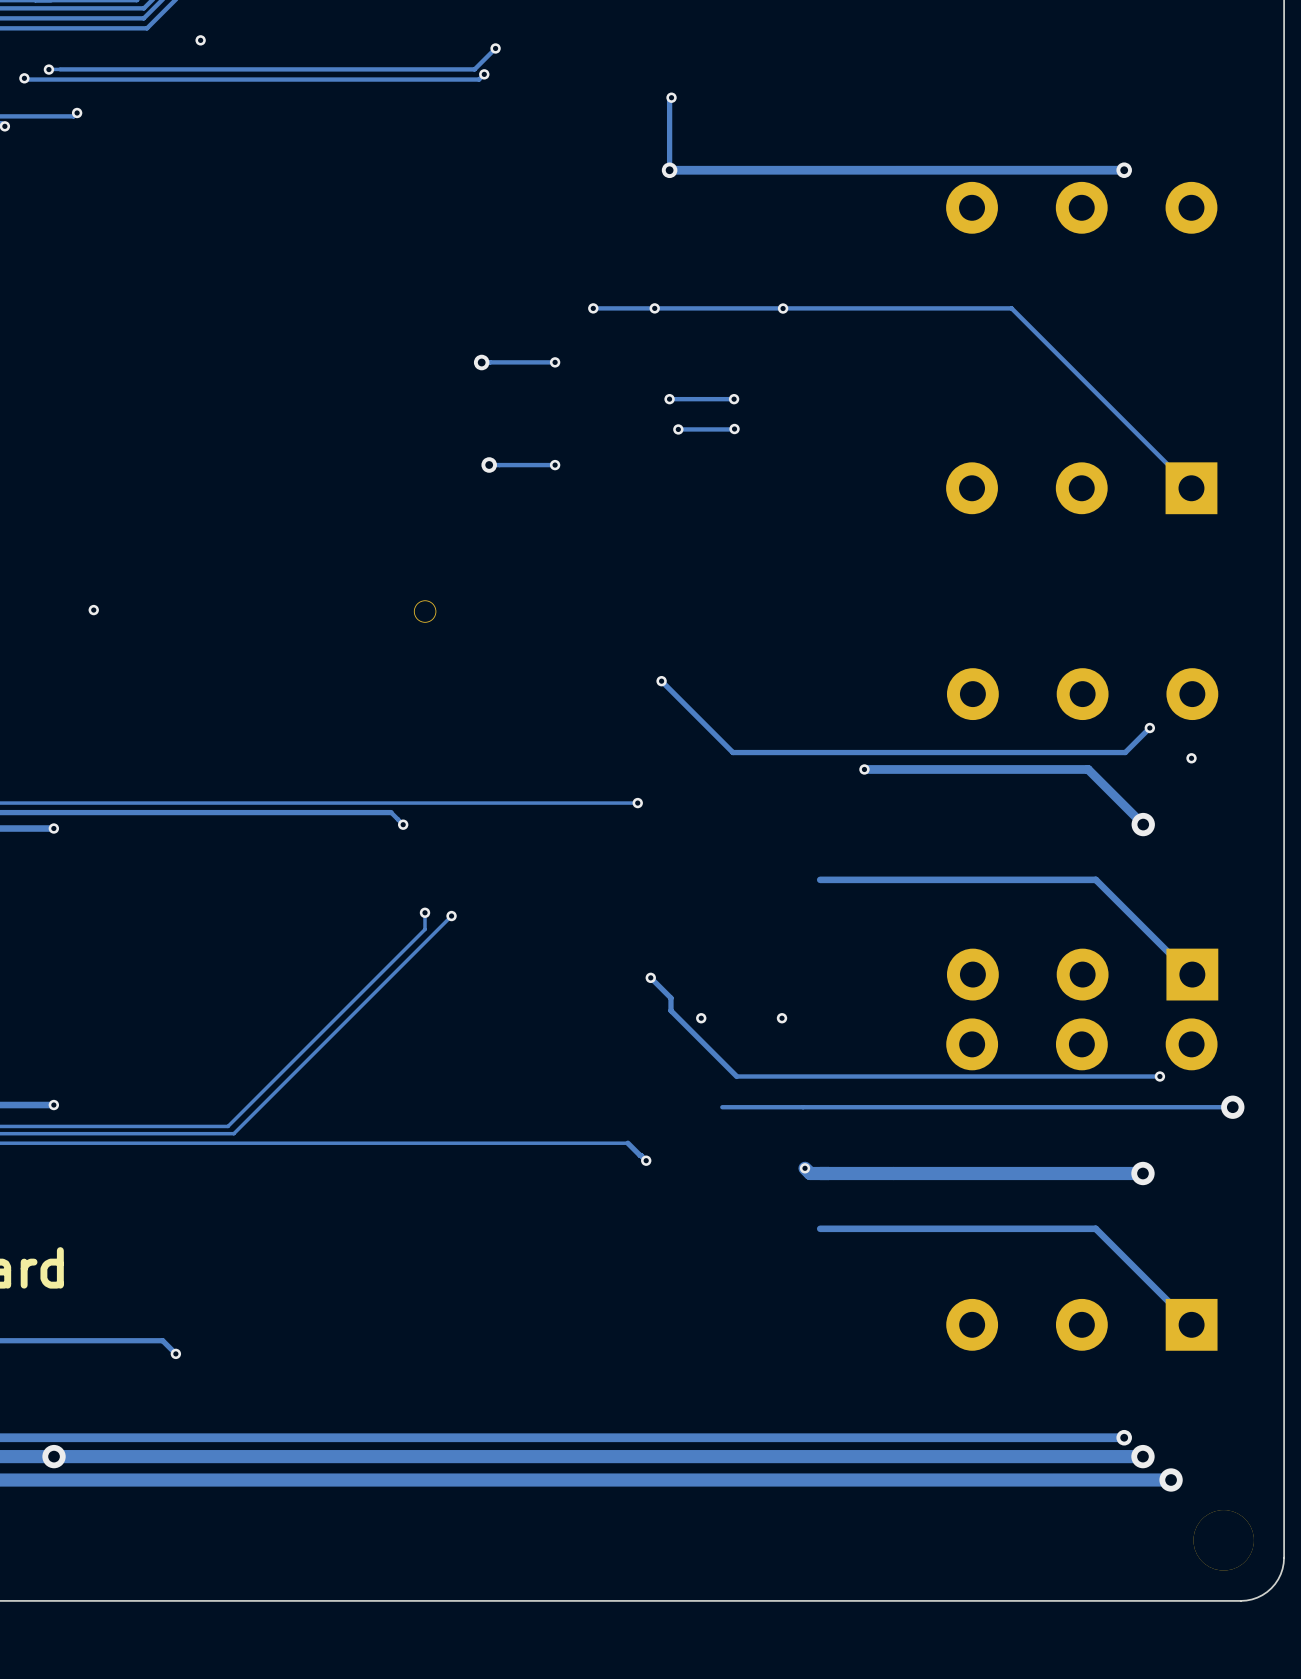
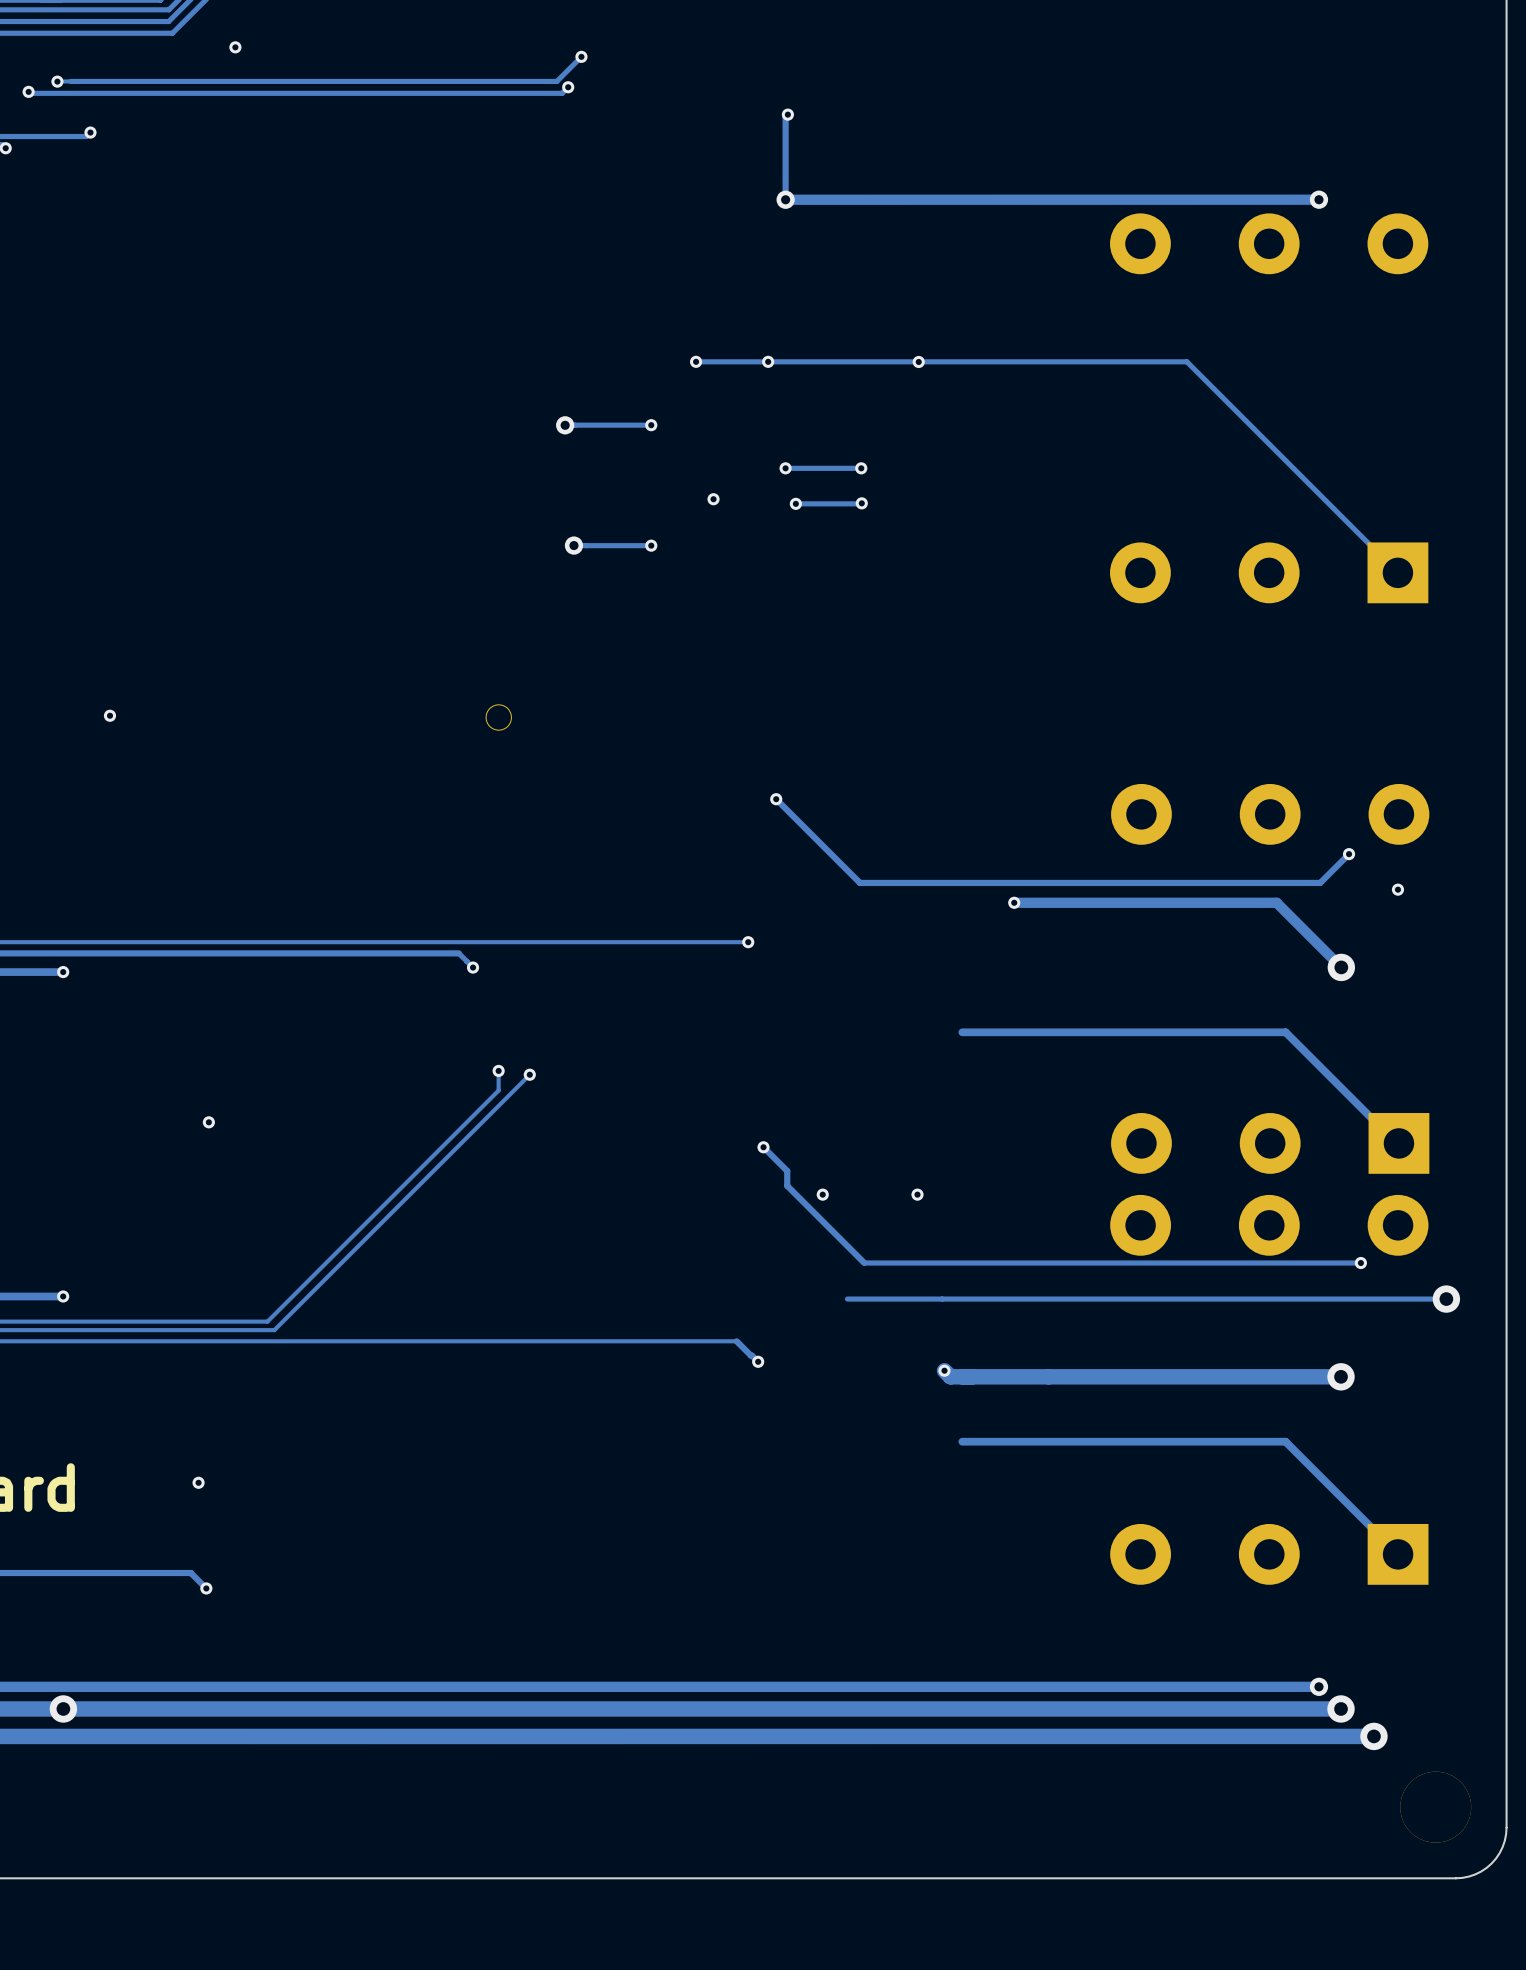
via: none -> (713, 499)
via: none -> (208, 1122)
via: none -> (198, 1482)

